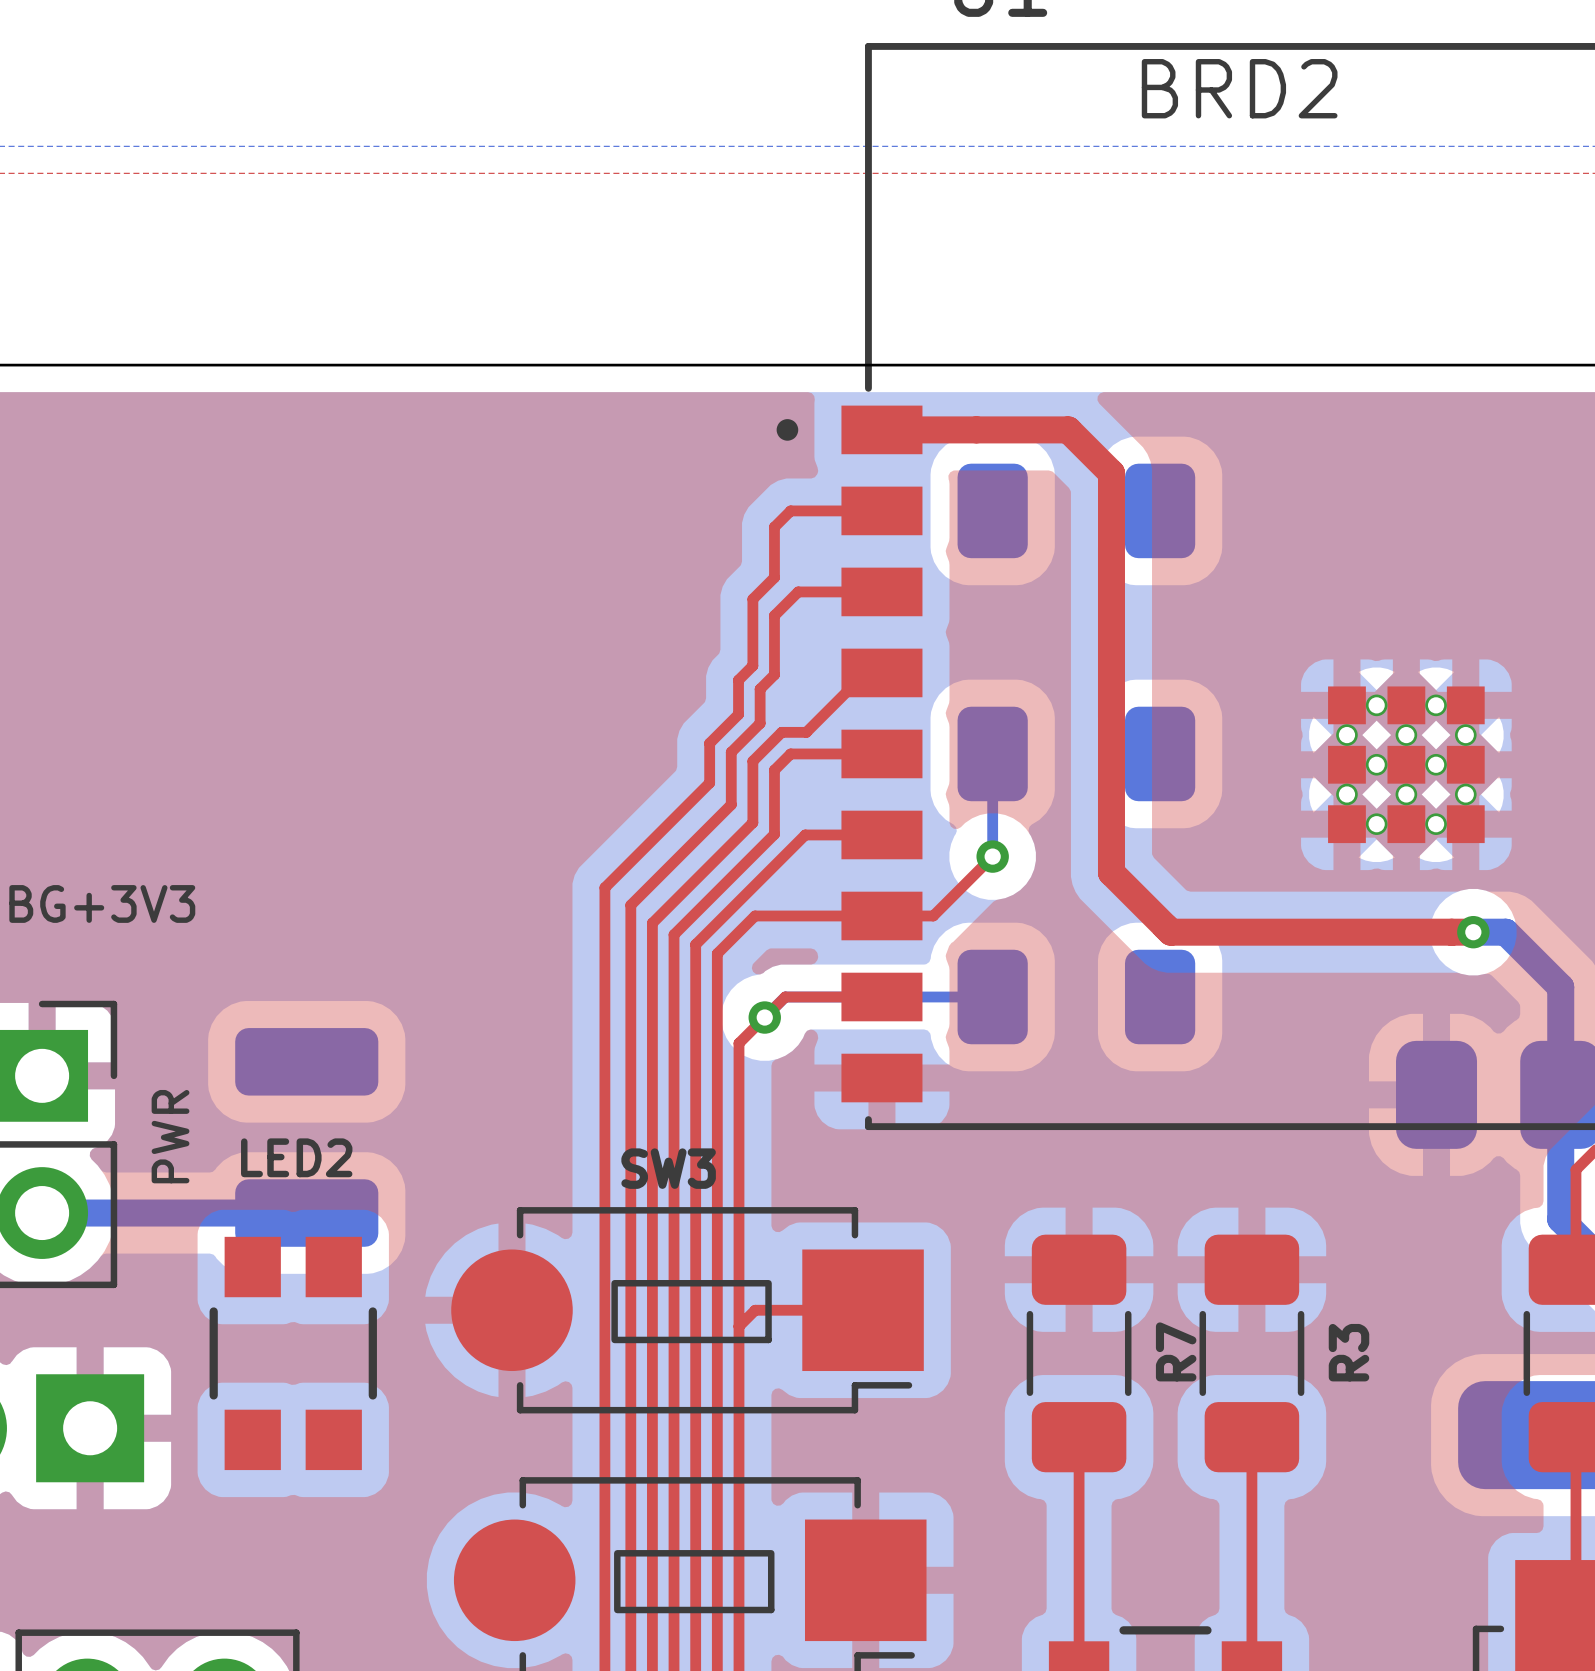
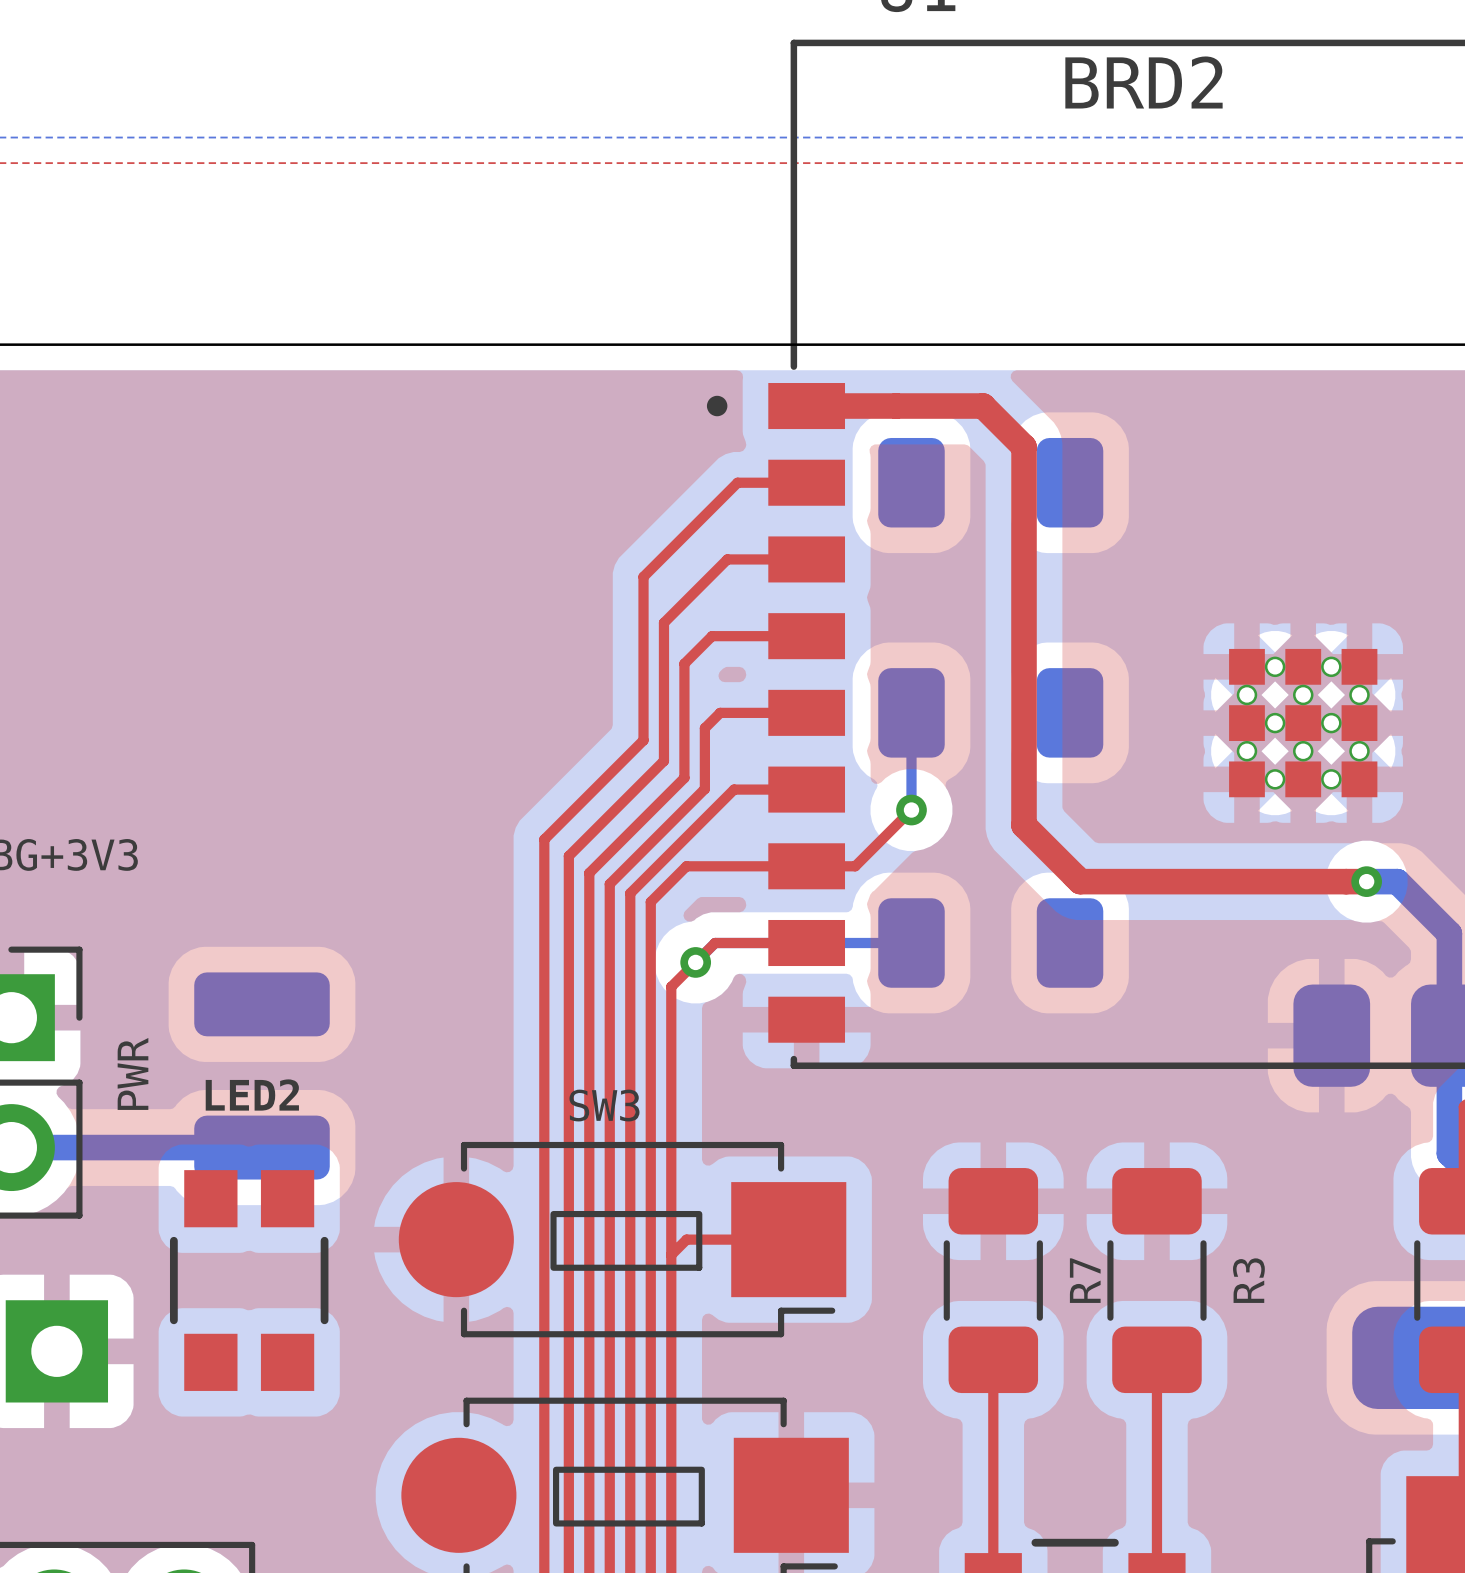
top track: (809, 510) (790, 510) (774, 527) (774, 577) (752, 599) (752, 665) (738, 680) (738, 714) (709, 743) -> (737, 482) (643, 576) (643, 702)
top track: (774, 615) (774, 674) (760, 689) (760, 723) (731, 752) -> (704, 581) (663, 622) (663, 711)
top track: (865, 672) (806, 732) (781, 732) (752, 761) -> (791, 636) (712, 636) (684, 663) (684, 719)

